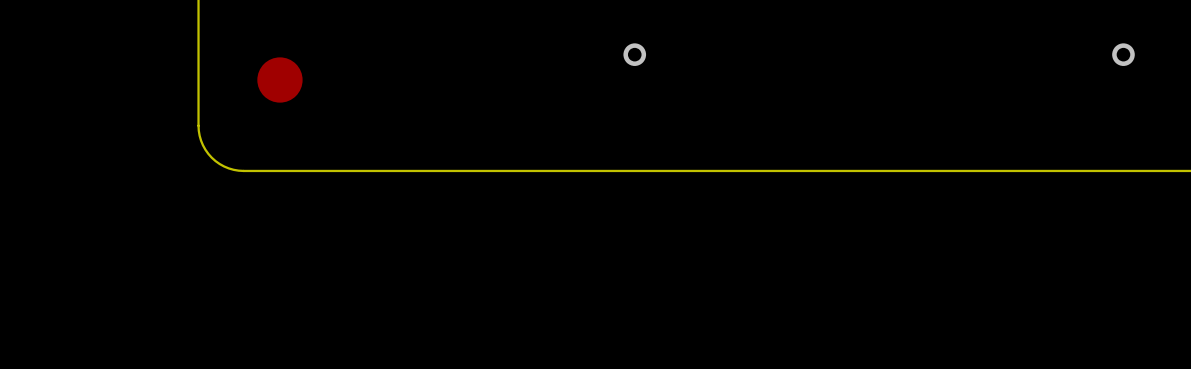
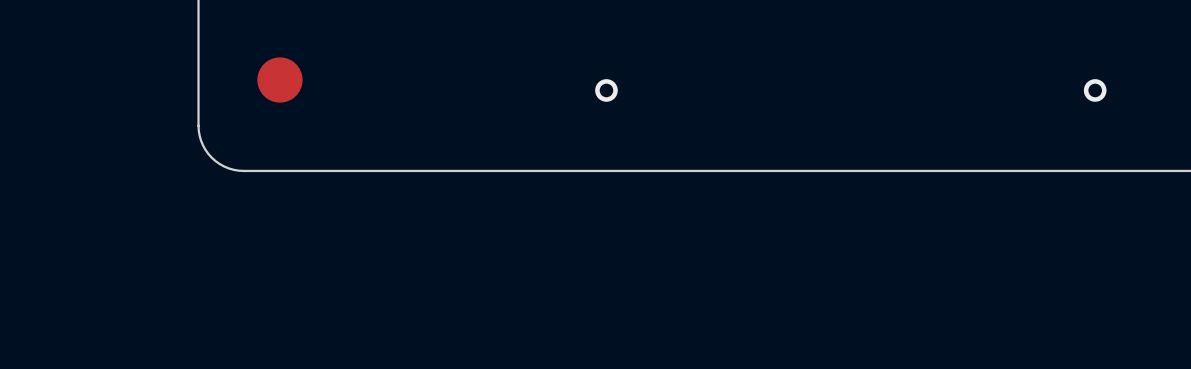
via position: (634, 54) -> (606, 90)
via position: (1123, 54) -> (1095, 90)

